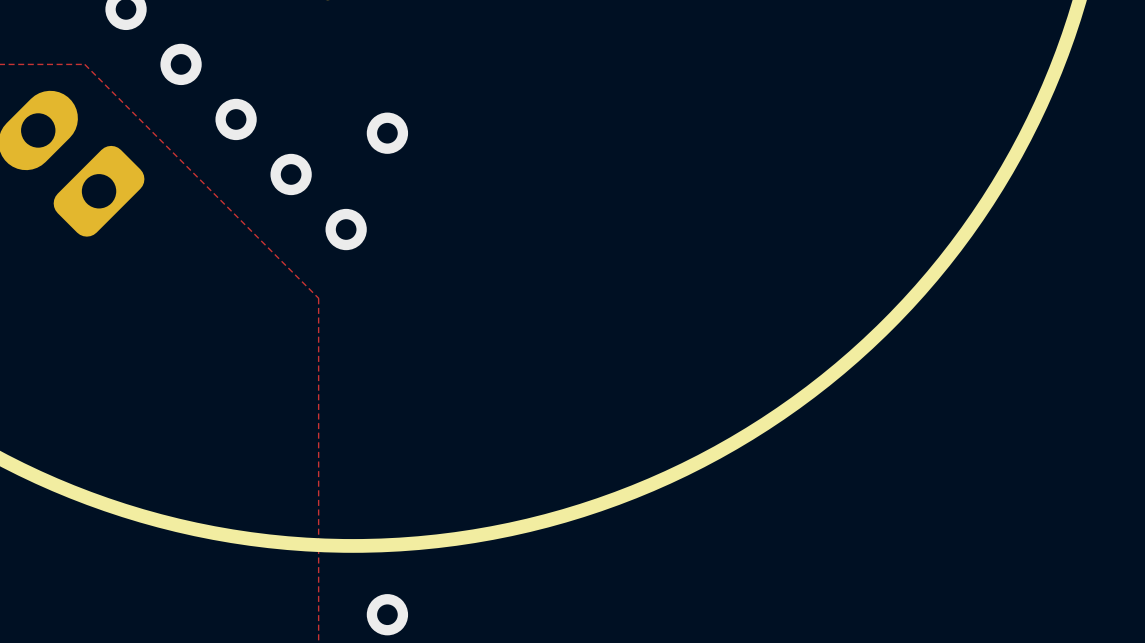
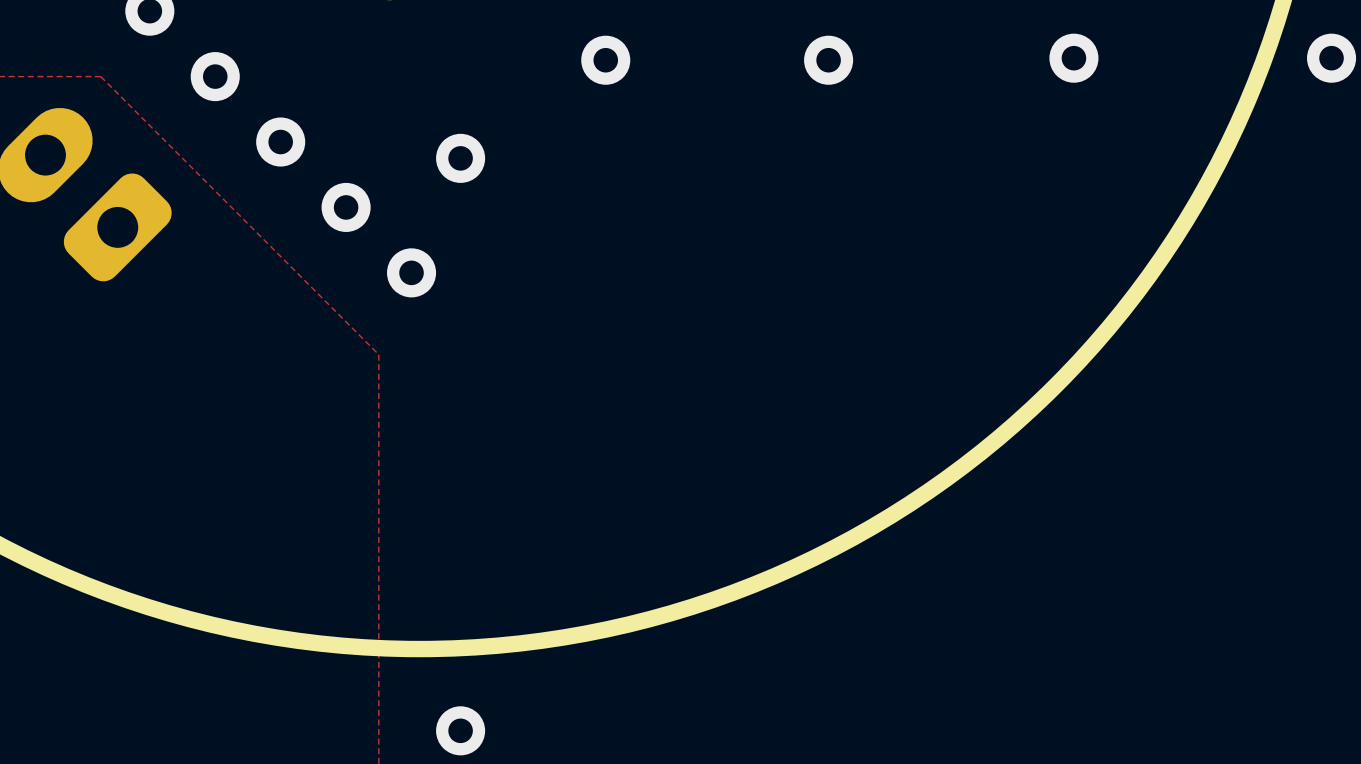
via: none -> (1073, 58)
via: none -> (1331, 58)
via: none -> (605, 60)
via: none -> (828, 60)

